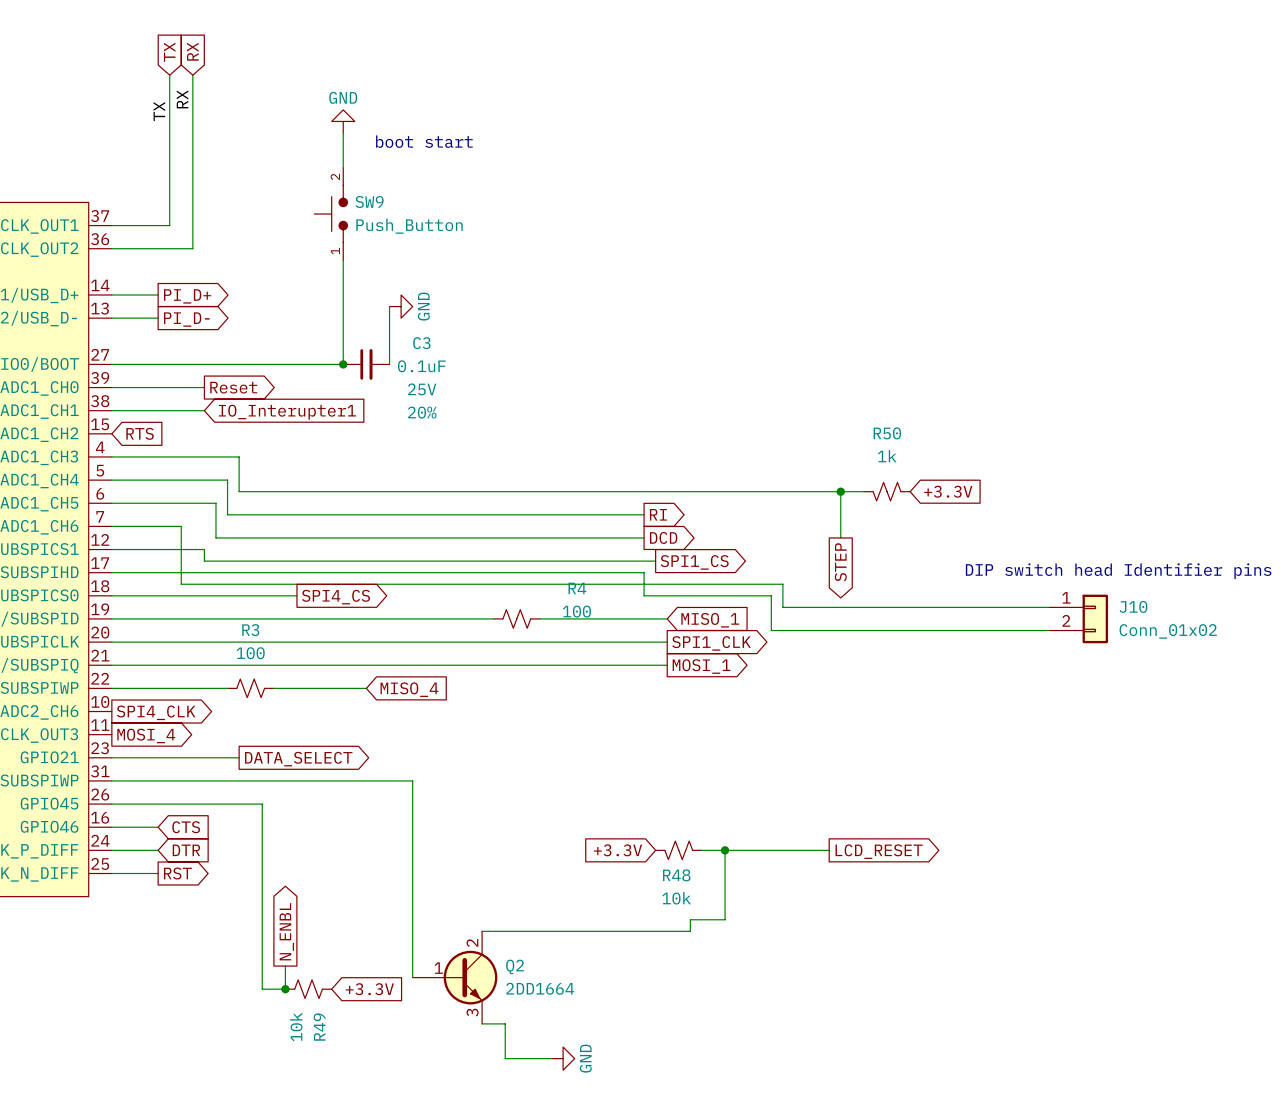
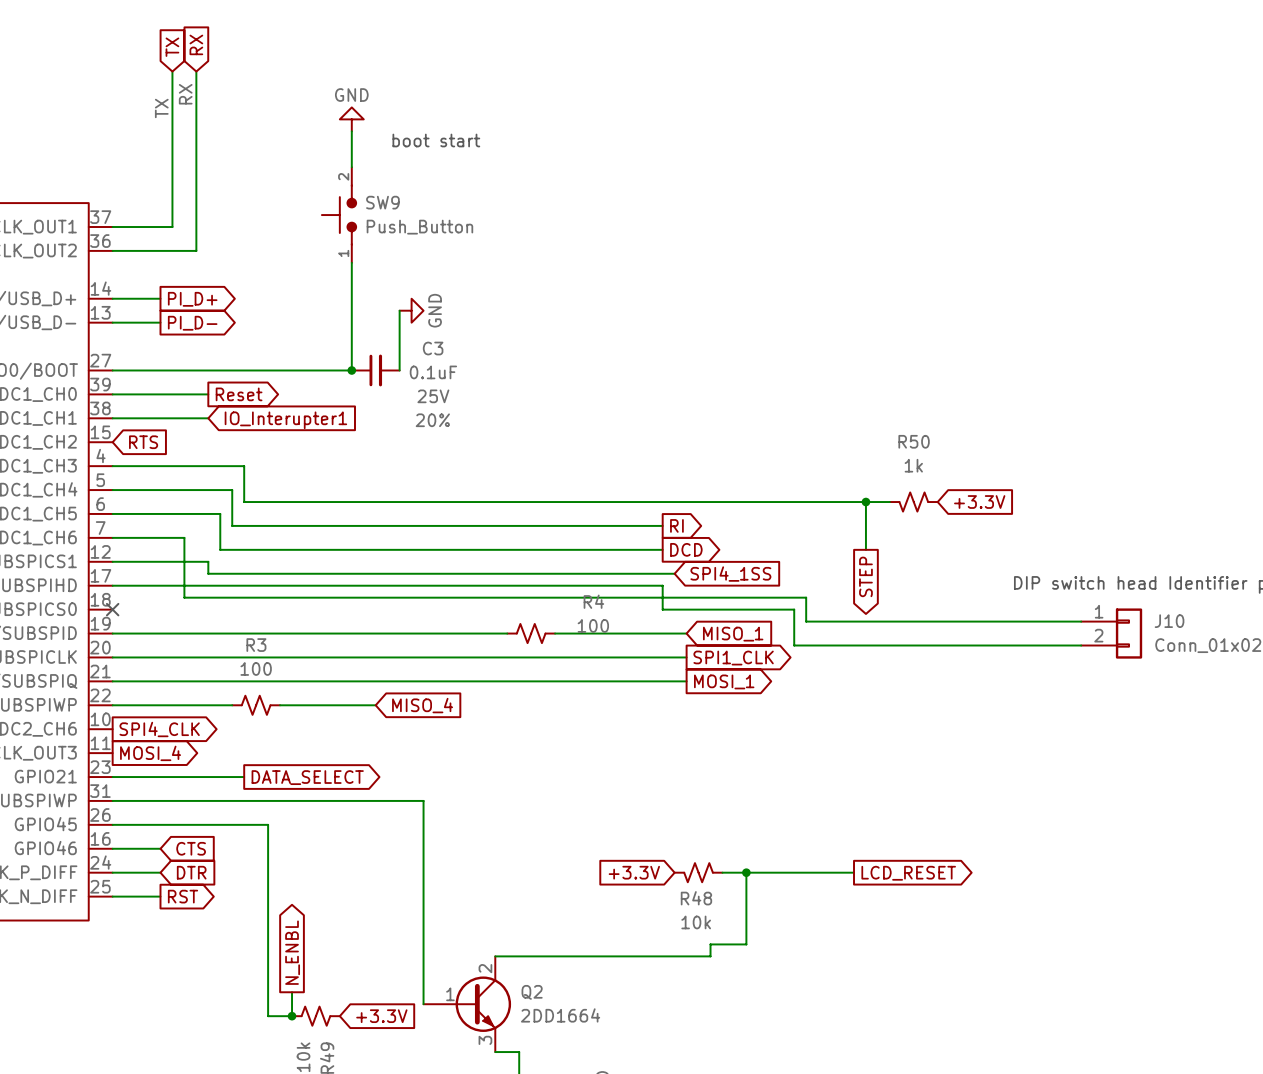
global label shape: output (694, 562) -> input (730, 574)
global label: SPI1_CS (694, 562) -> SPI4_1SS (730, 574)
wire: (111, 595) (296, 595) -> none
no-connect mark: none -> (112, 609)
global label: SPI4_CS (336, 597) -> none

